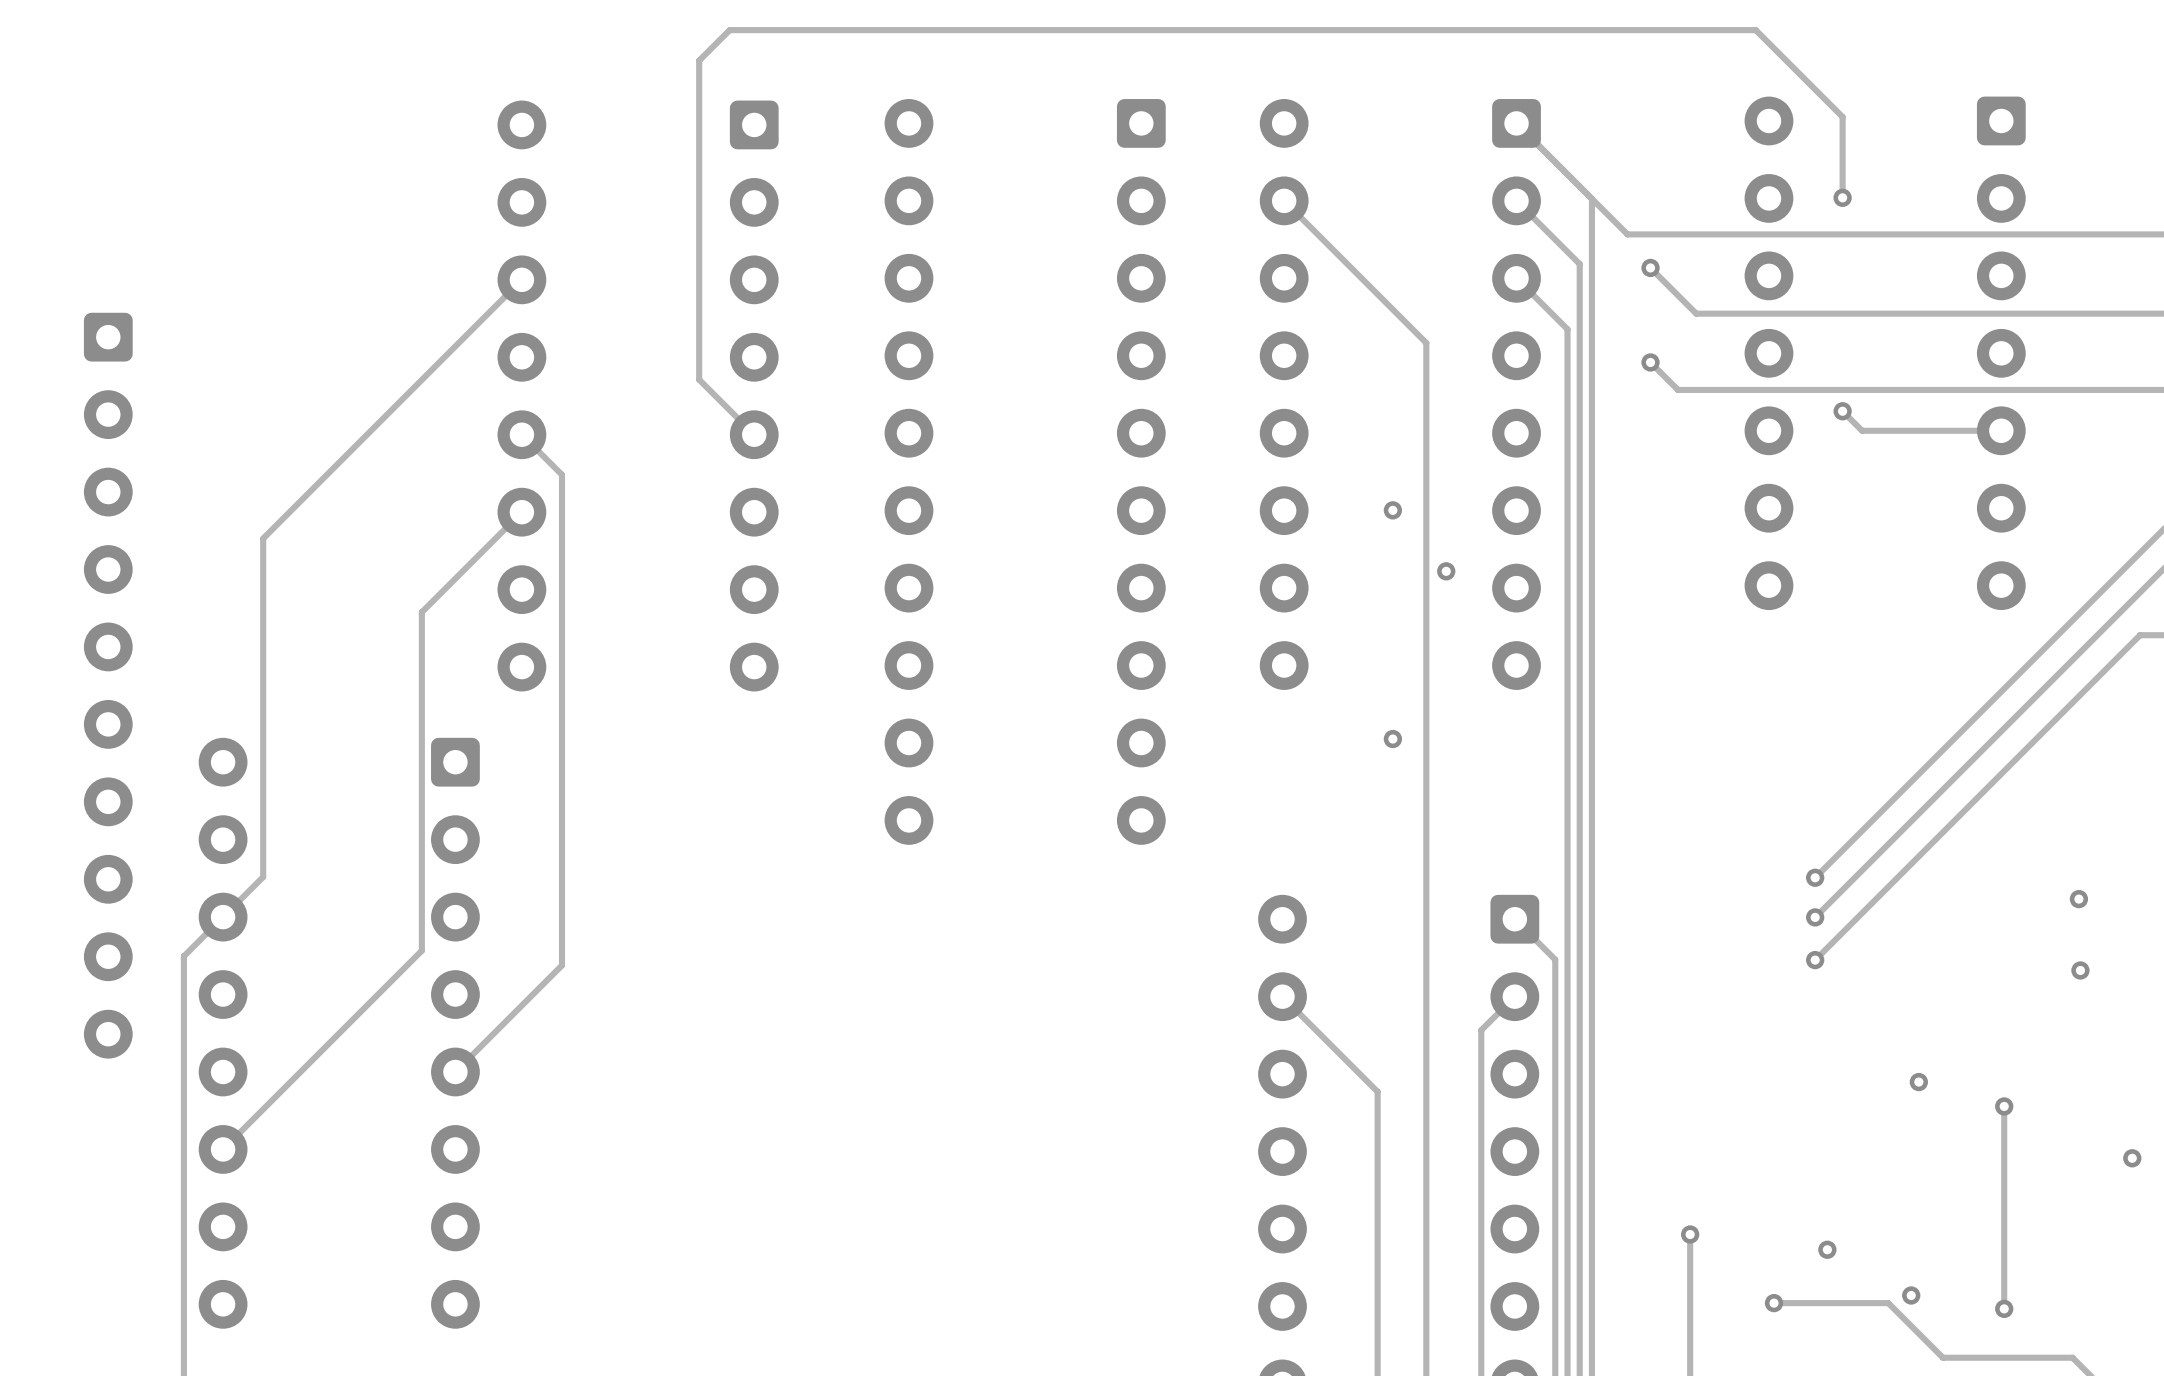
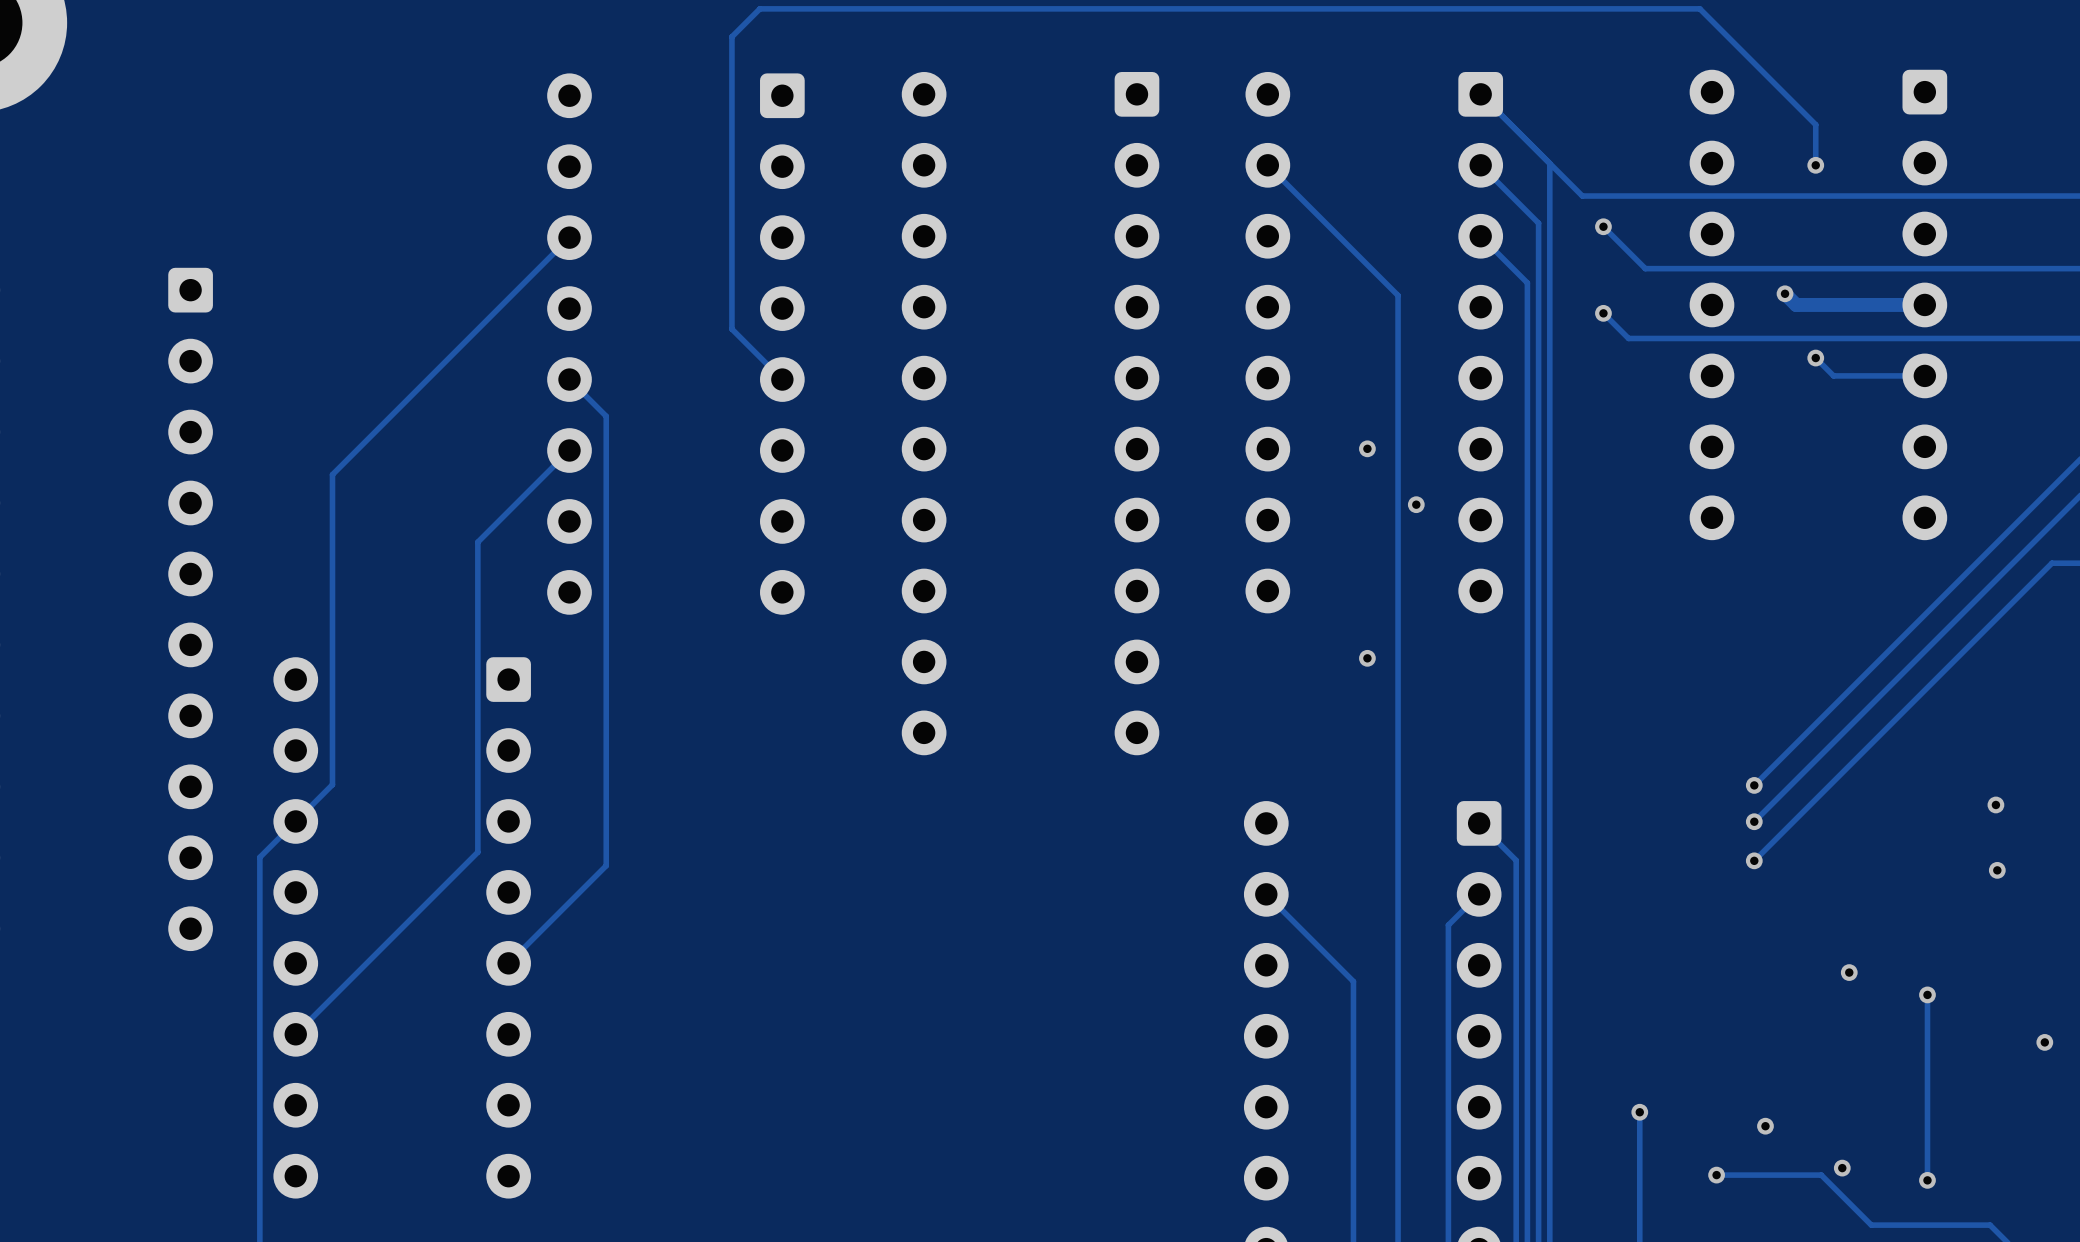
track: (1842, 116) (1842, 197) -> (1779, 88) (1815, 124) (1815, 165)
via position: (1842, 197) -> (1815, 165)
track: none -> (1785, 293) (1796, 304) (1924, 304)
via: none -> (1785, 293)
track: (1842, 411) (1862, 430) (1901, 430) -> (1815, 358) (1833, 375)
via: (1842, 411) -> none
via: none -> (1815, 358)

